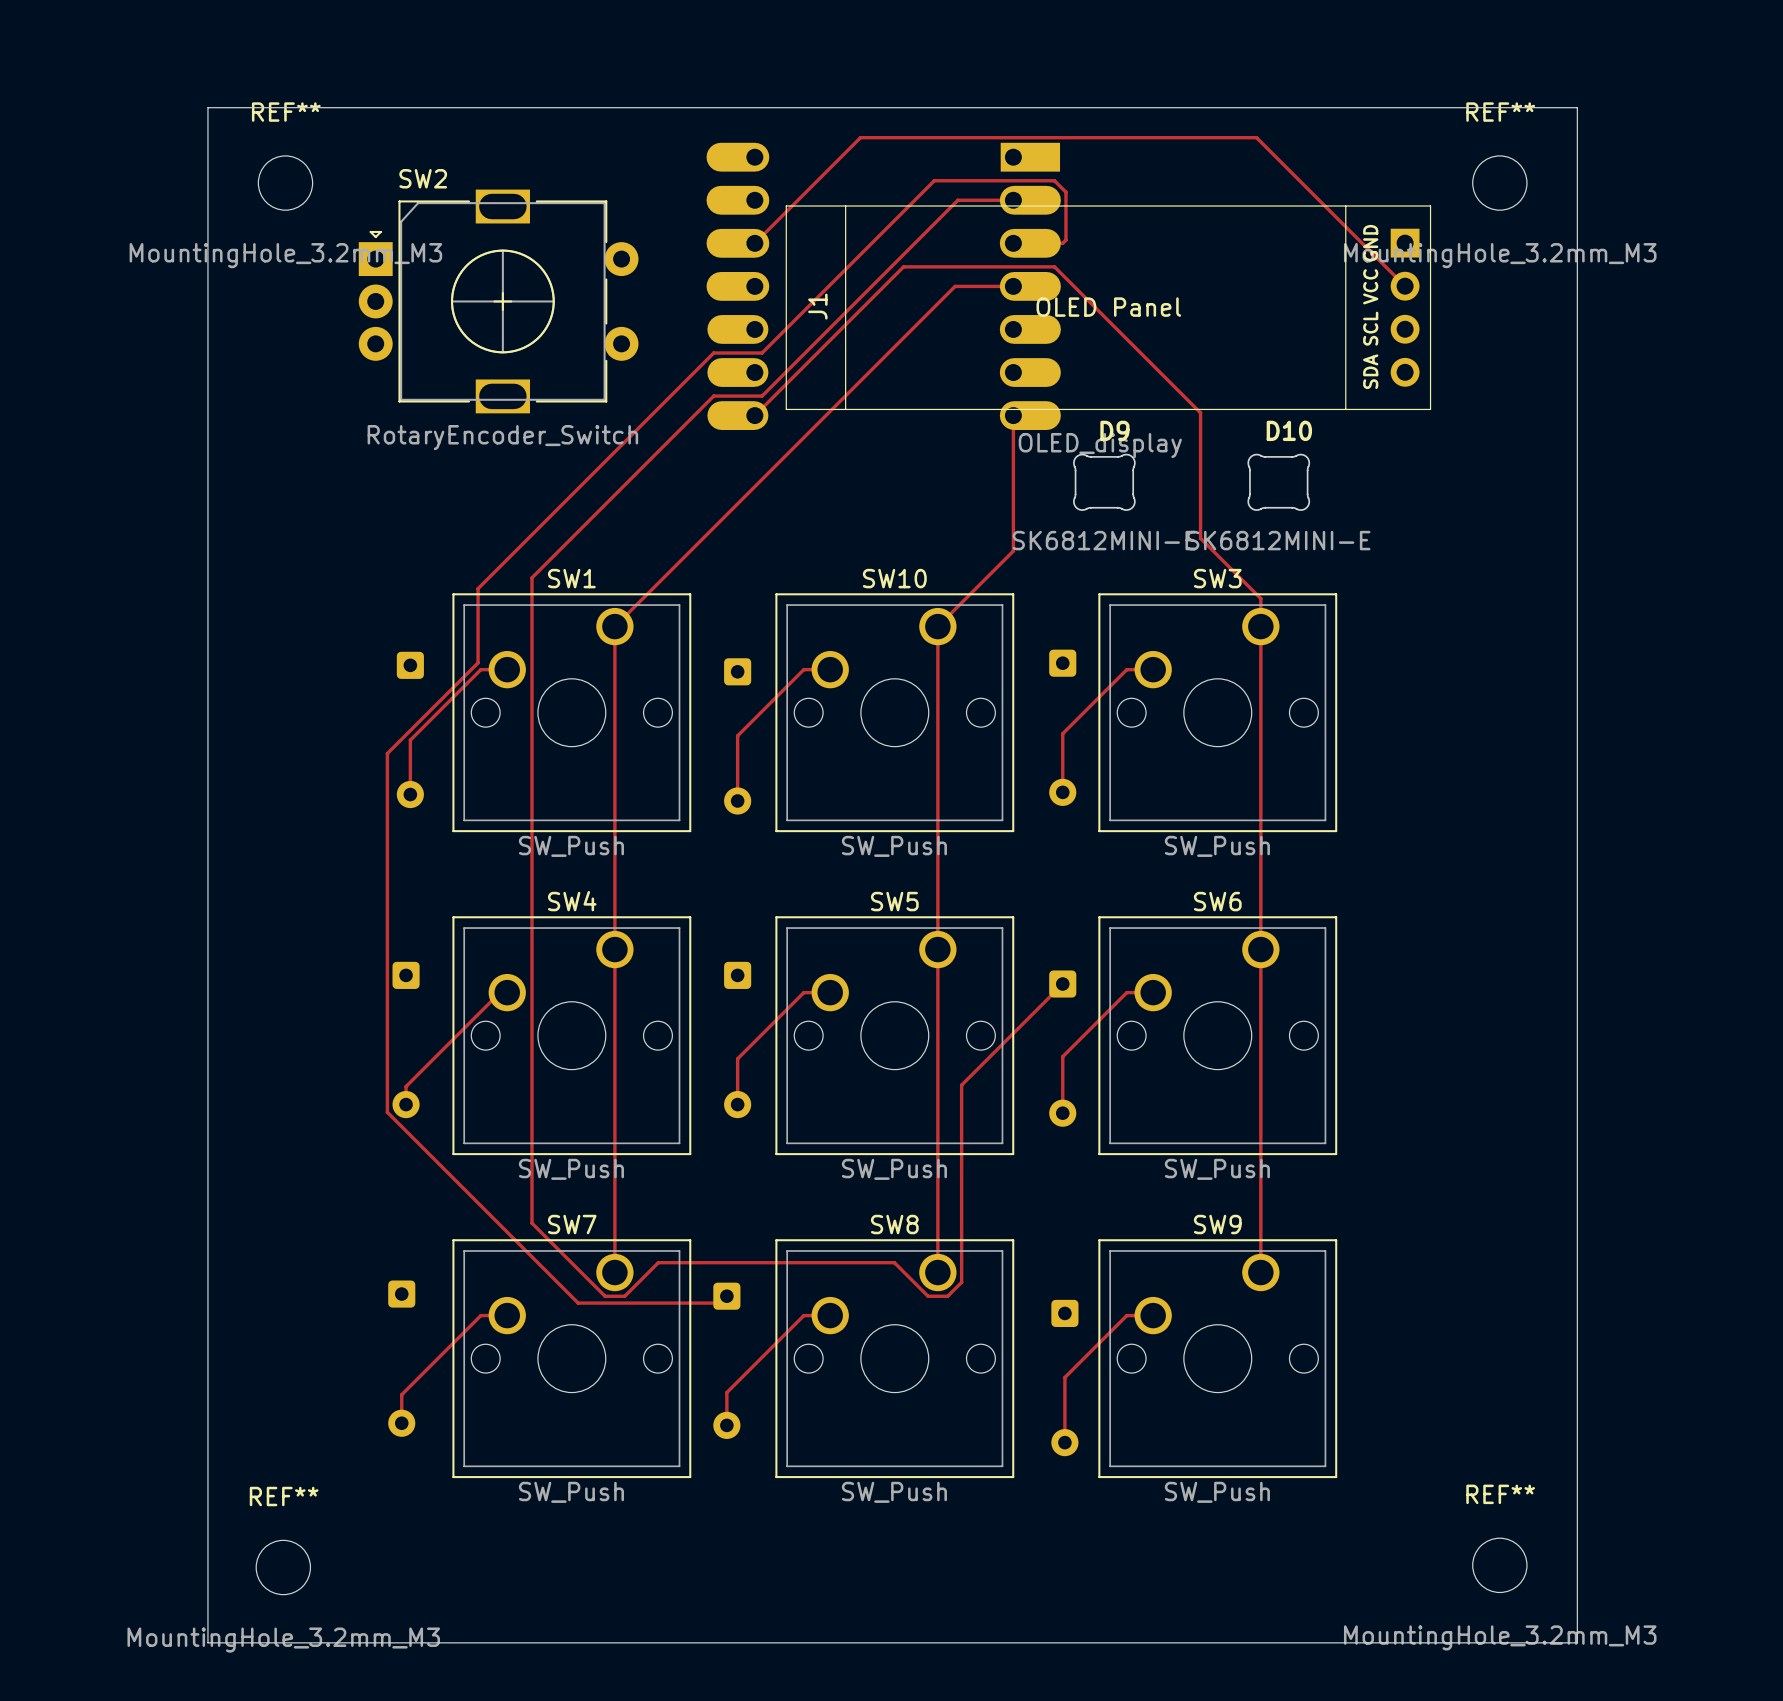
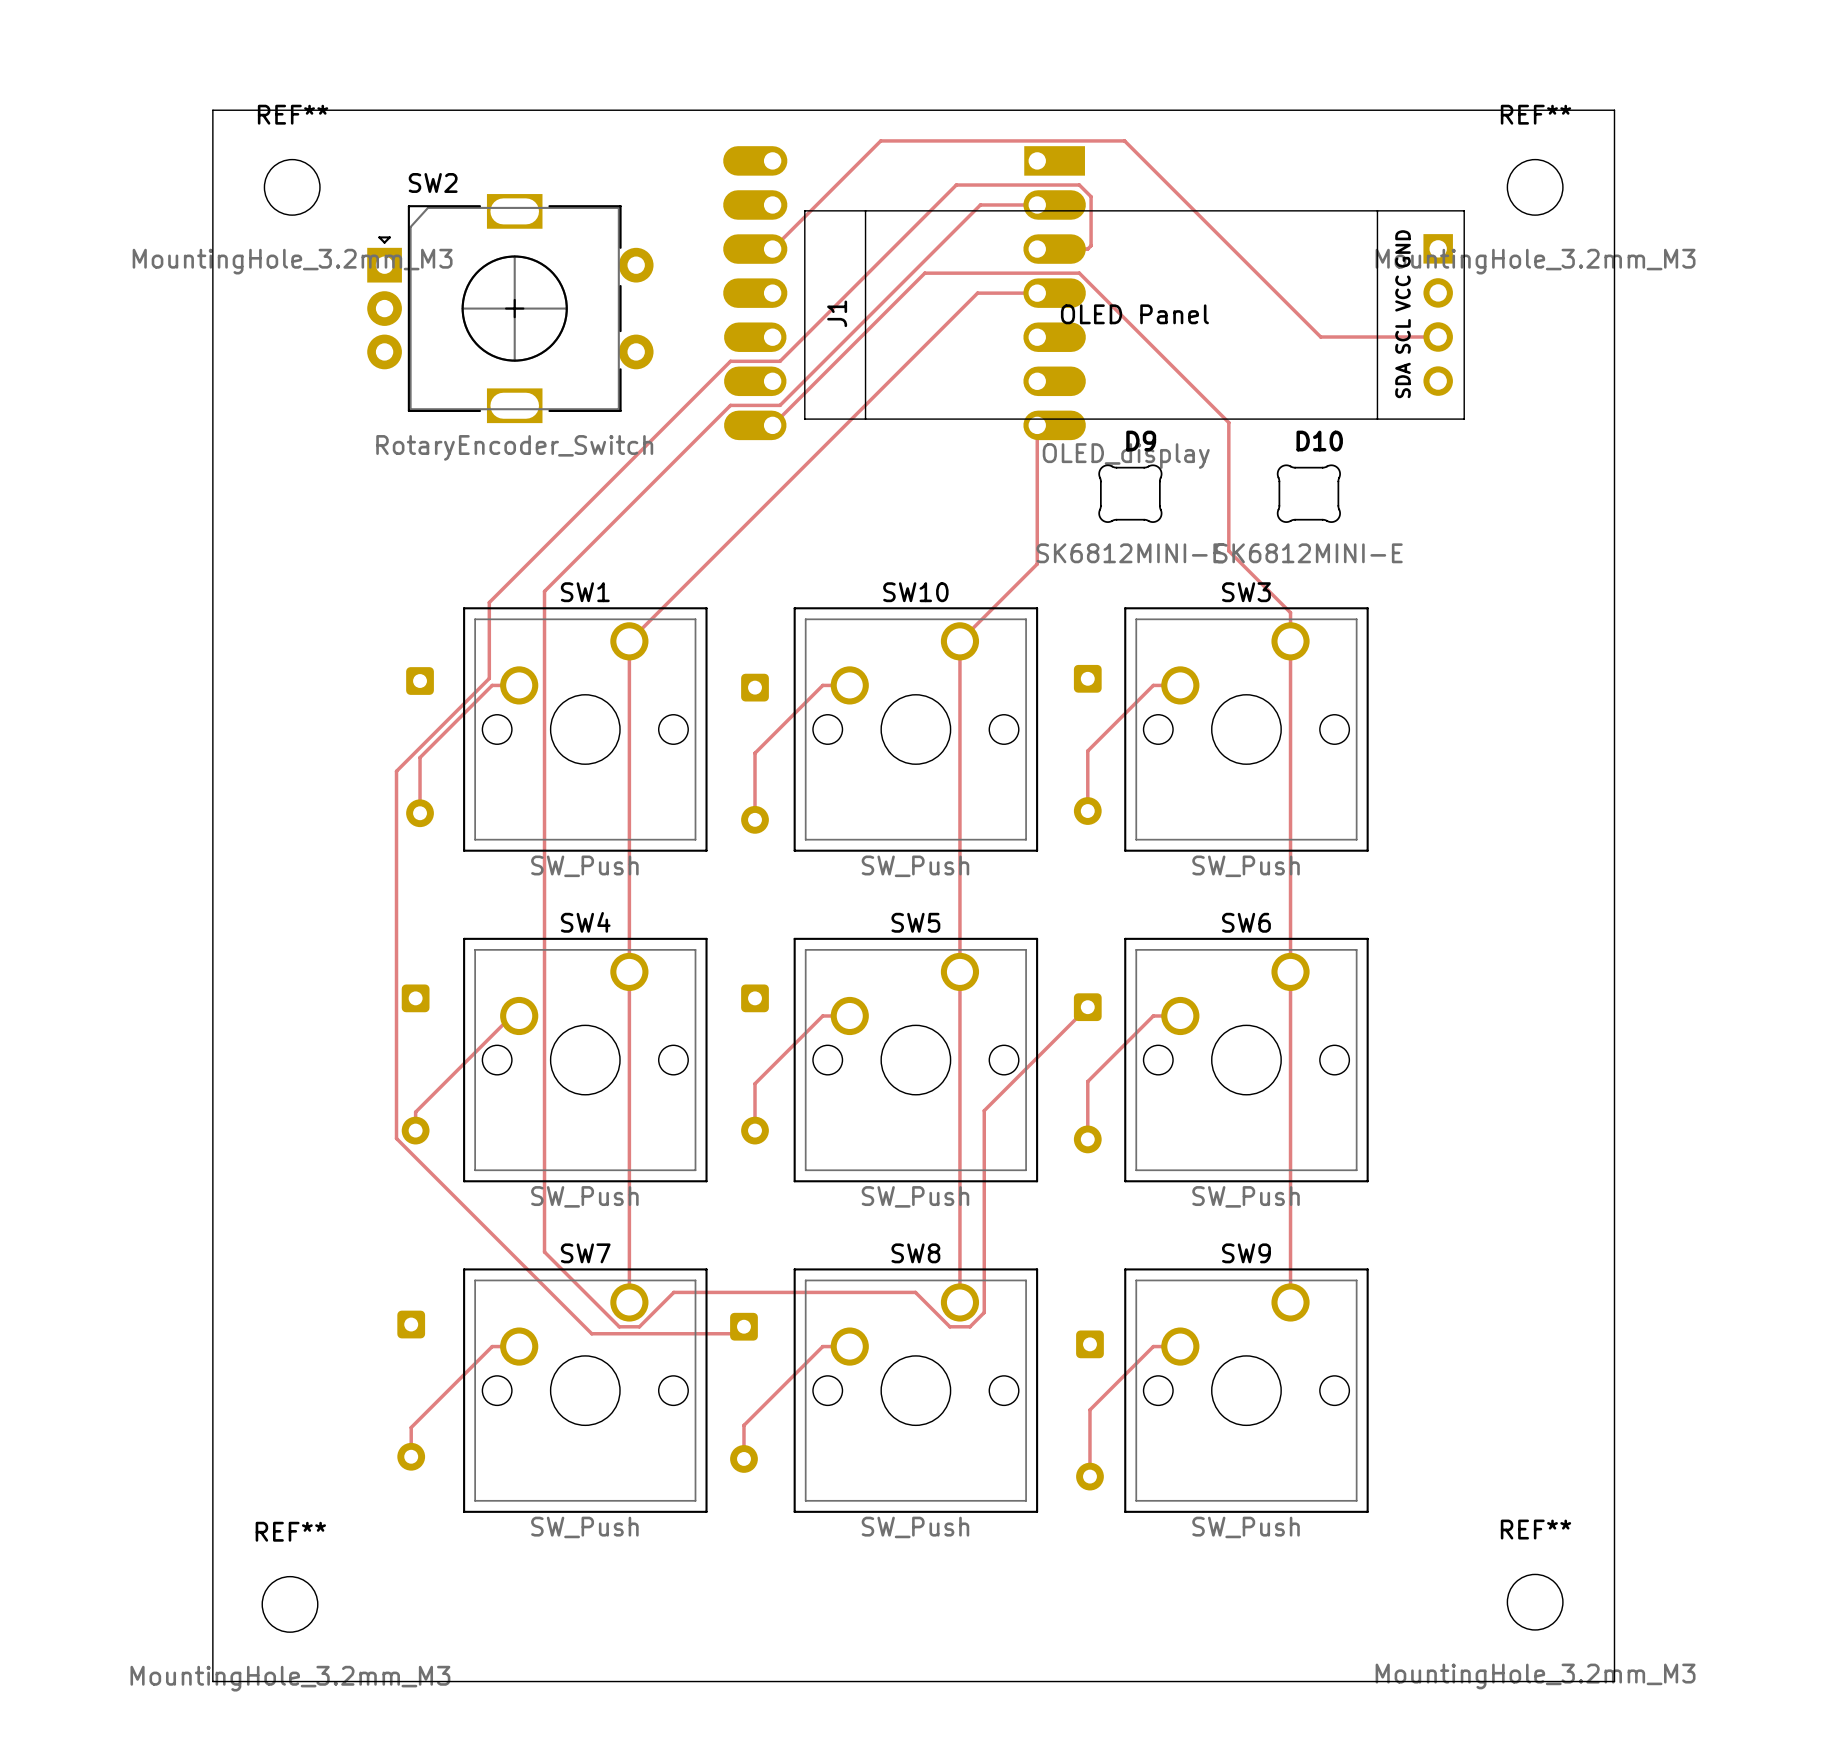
track: (1098, 137) (1256, 137) (1405, 286) -> (1124, 140) (1320, 337) (1438, 337)

